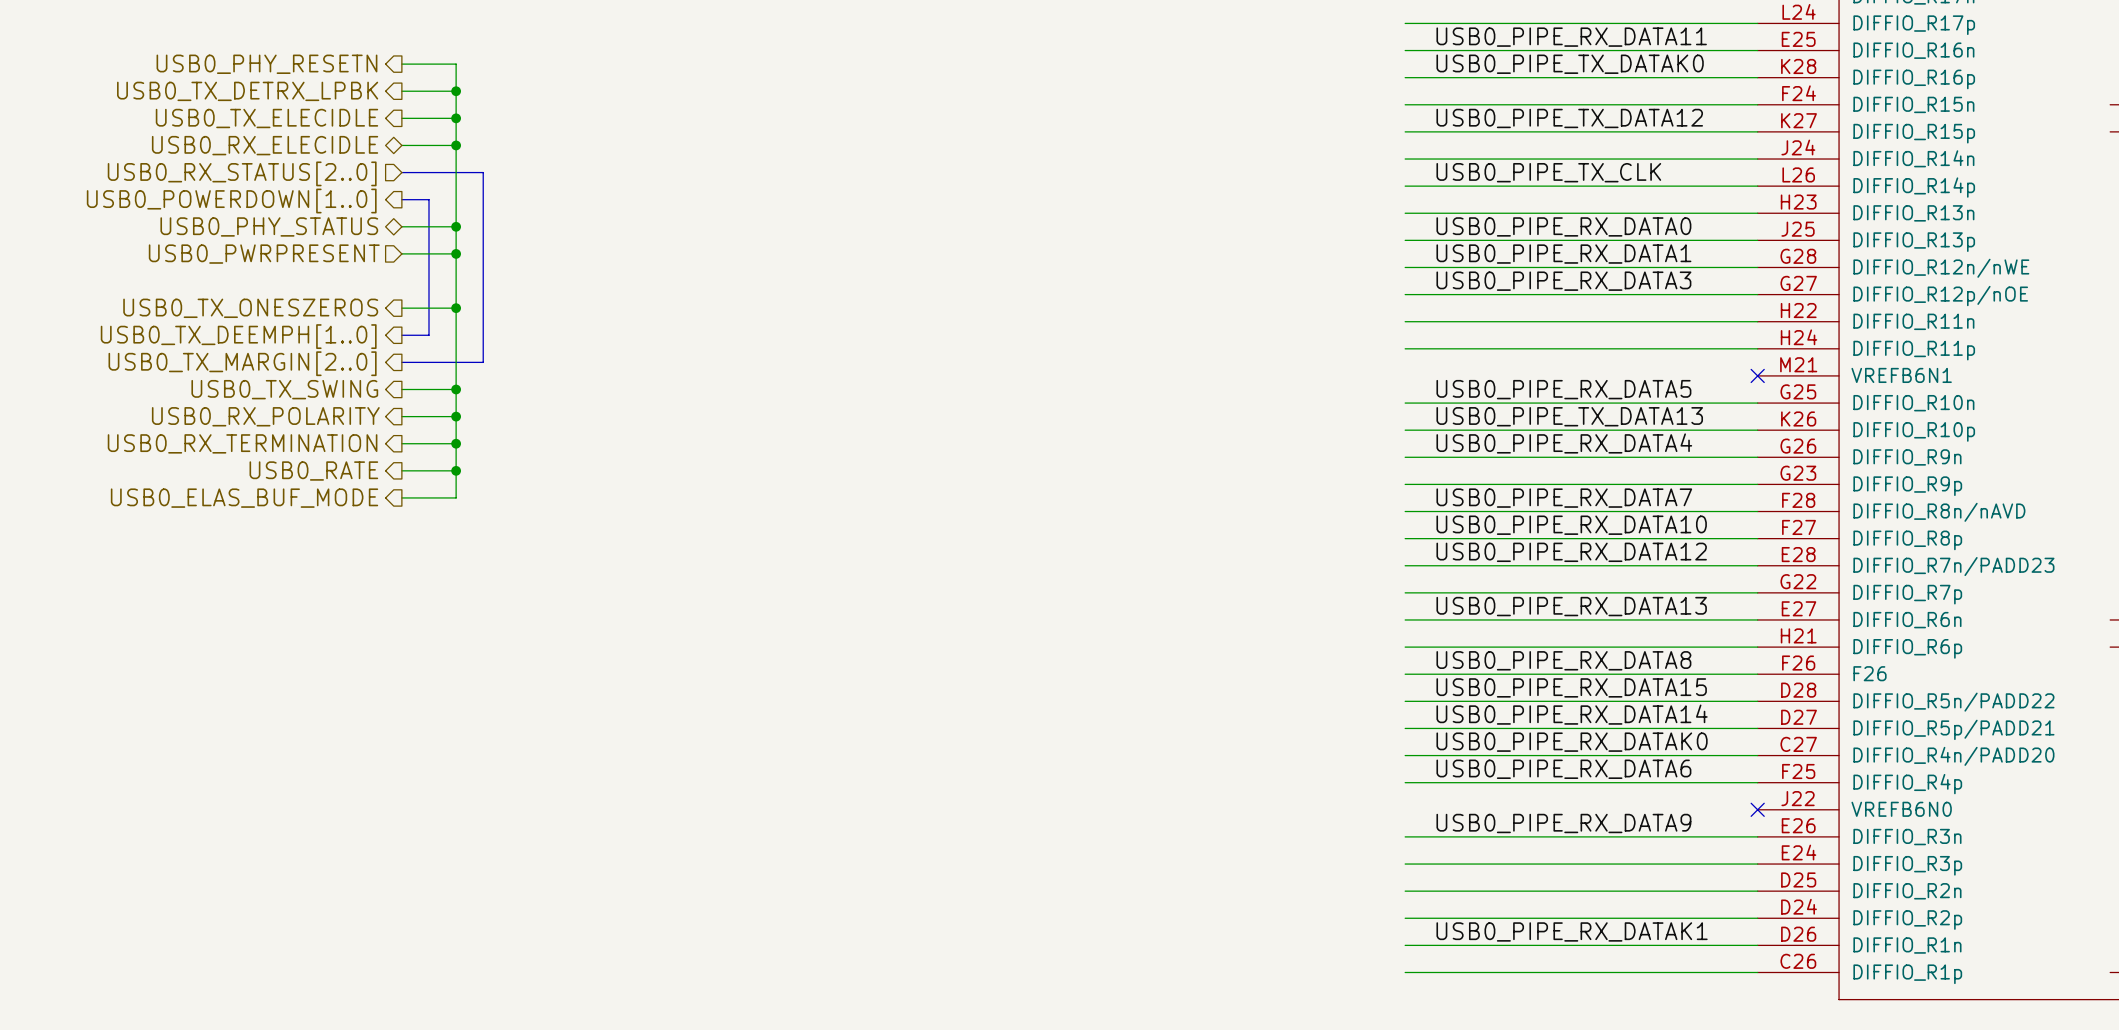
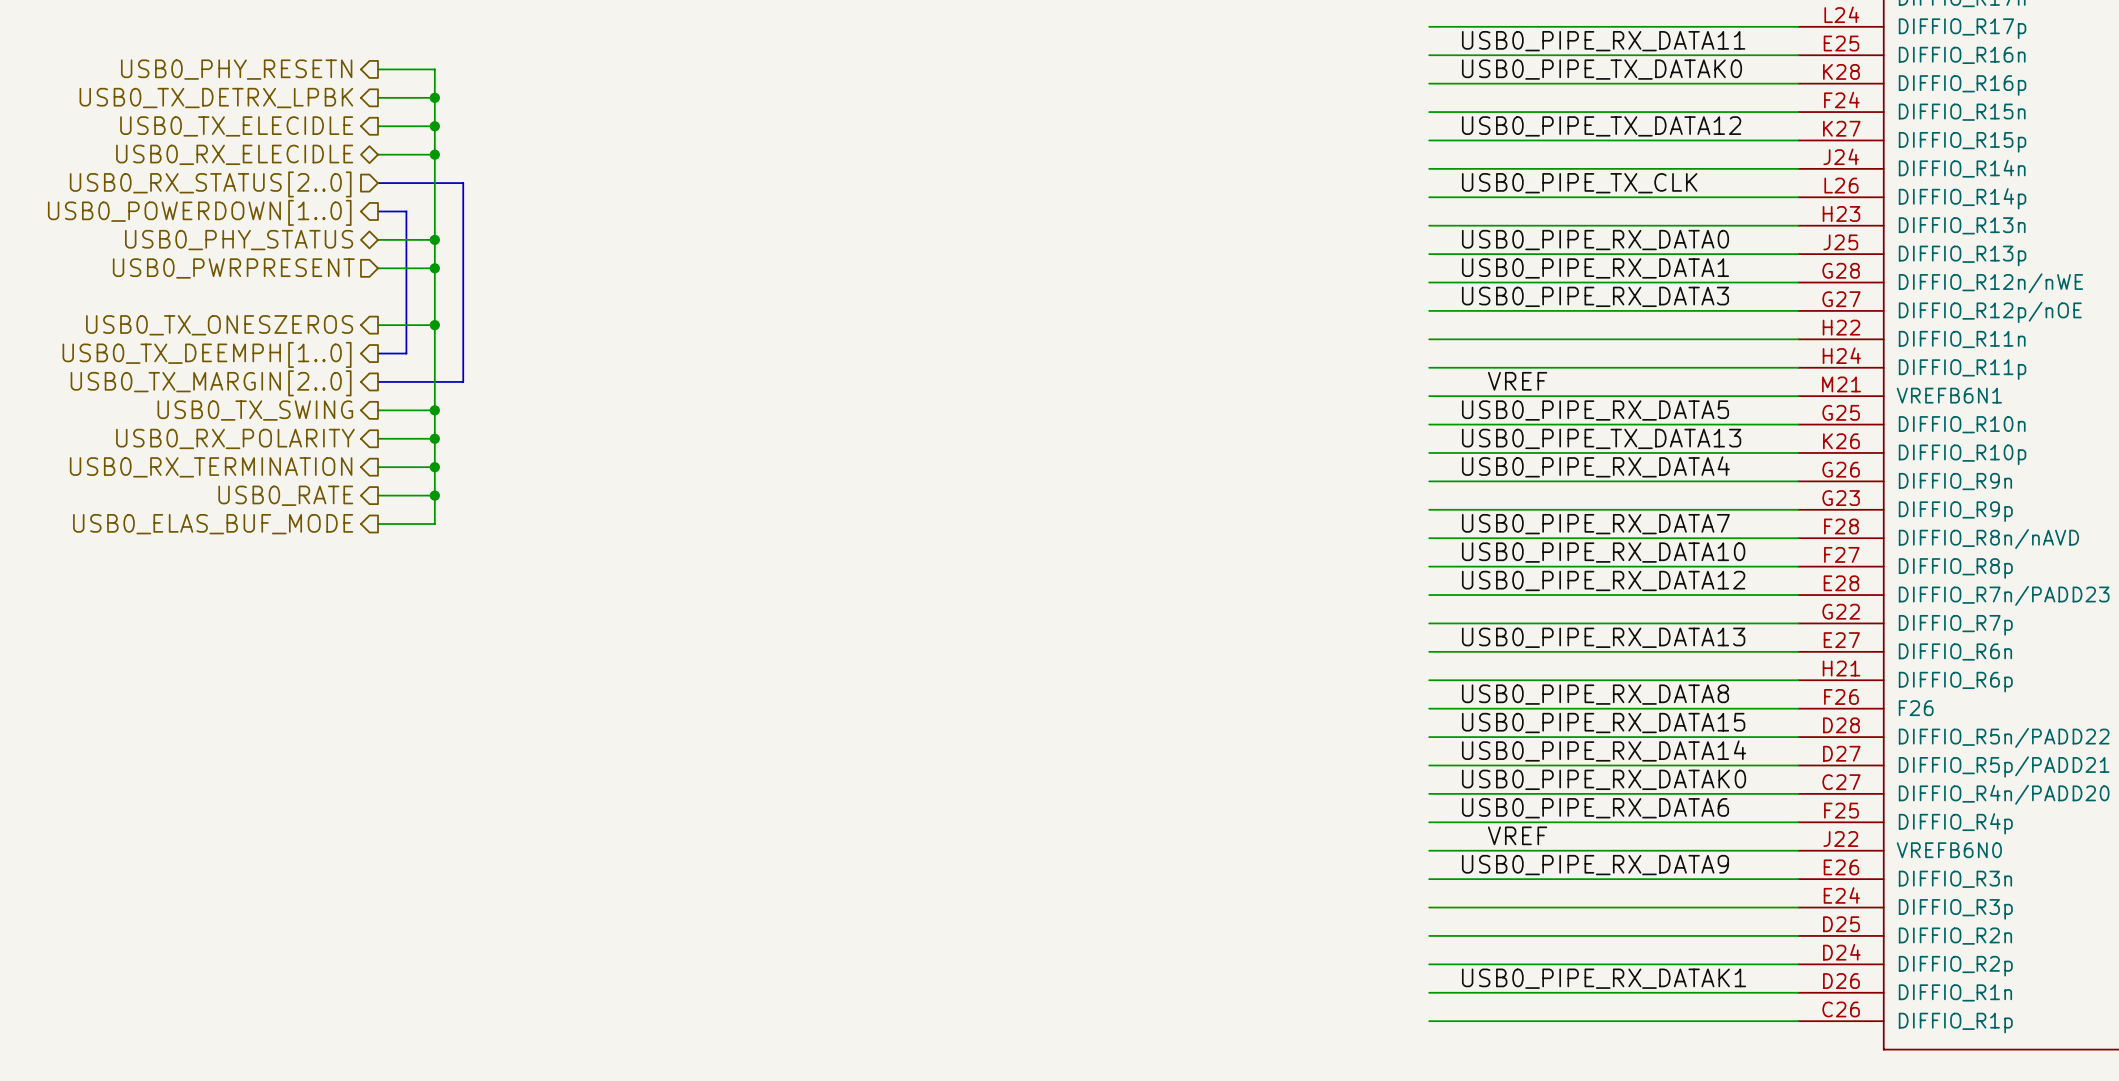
label: none -> VREF (1517, 381)
wire: none -> (1429, 396) (1798, 396)
no-connect mark: (1757, 375) -> none
label: none -> VREF (1517, 835)
wire: none -> (1429, 850) (1798, 850)
no-connect mark: (1757, 809) -> none

